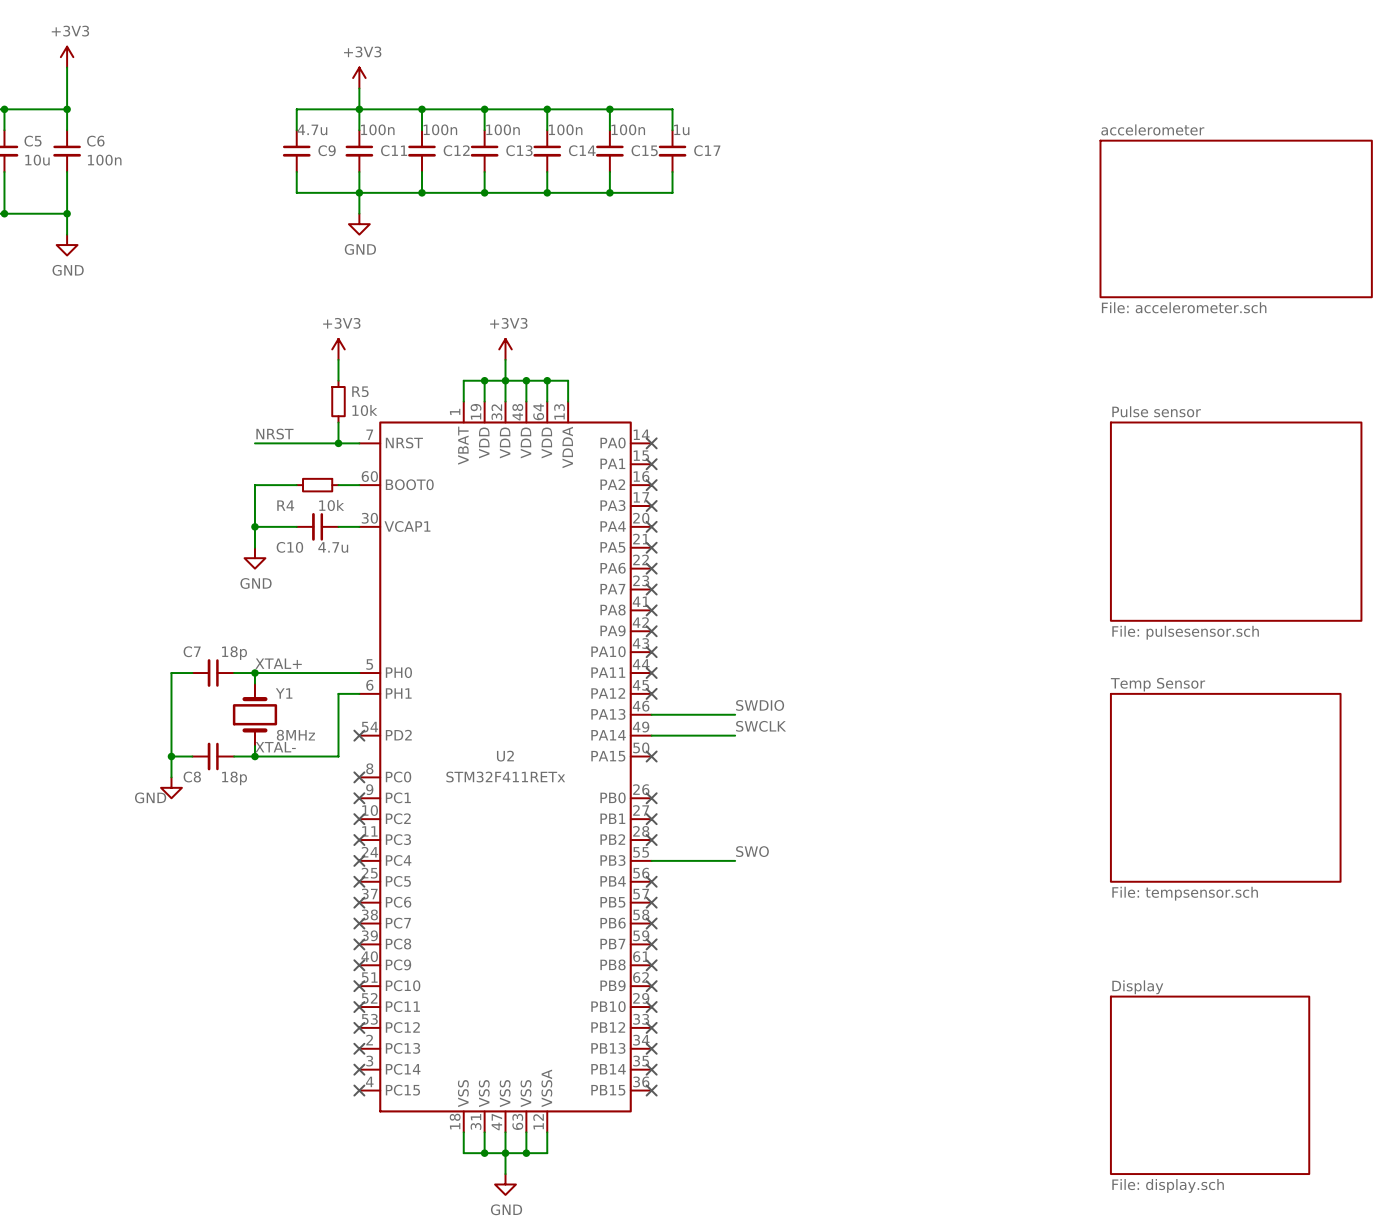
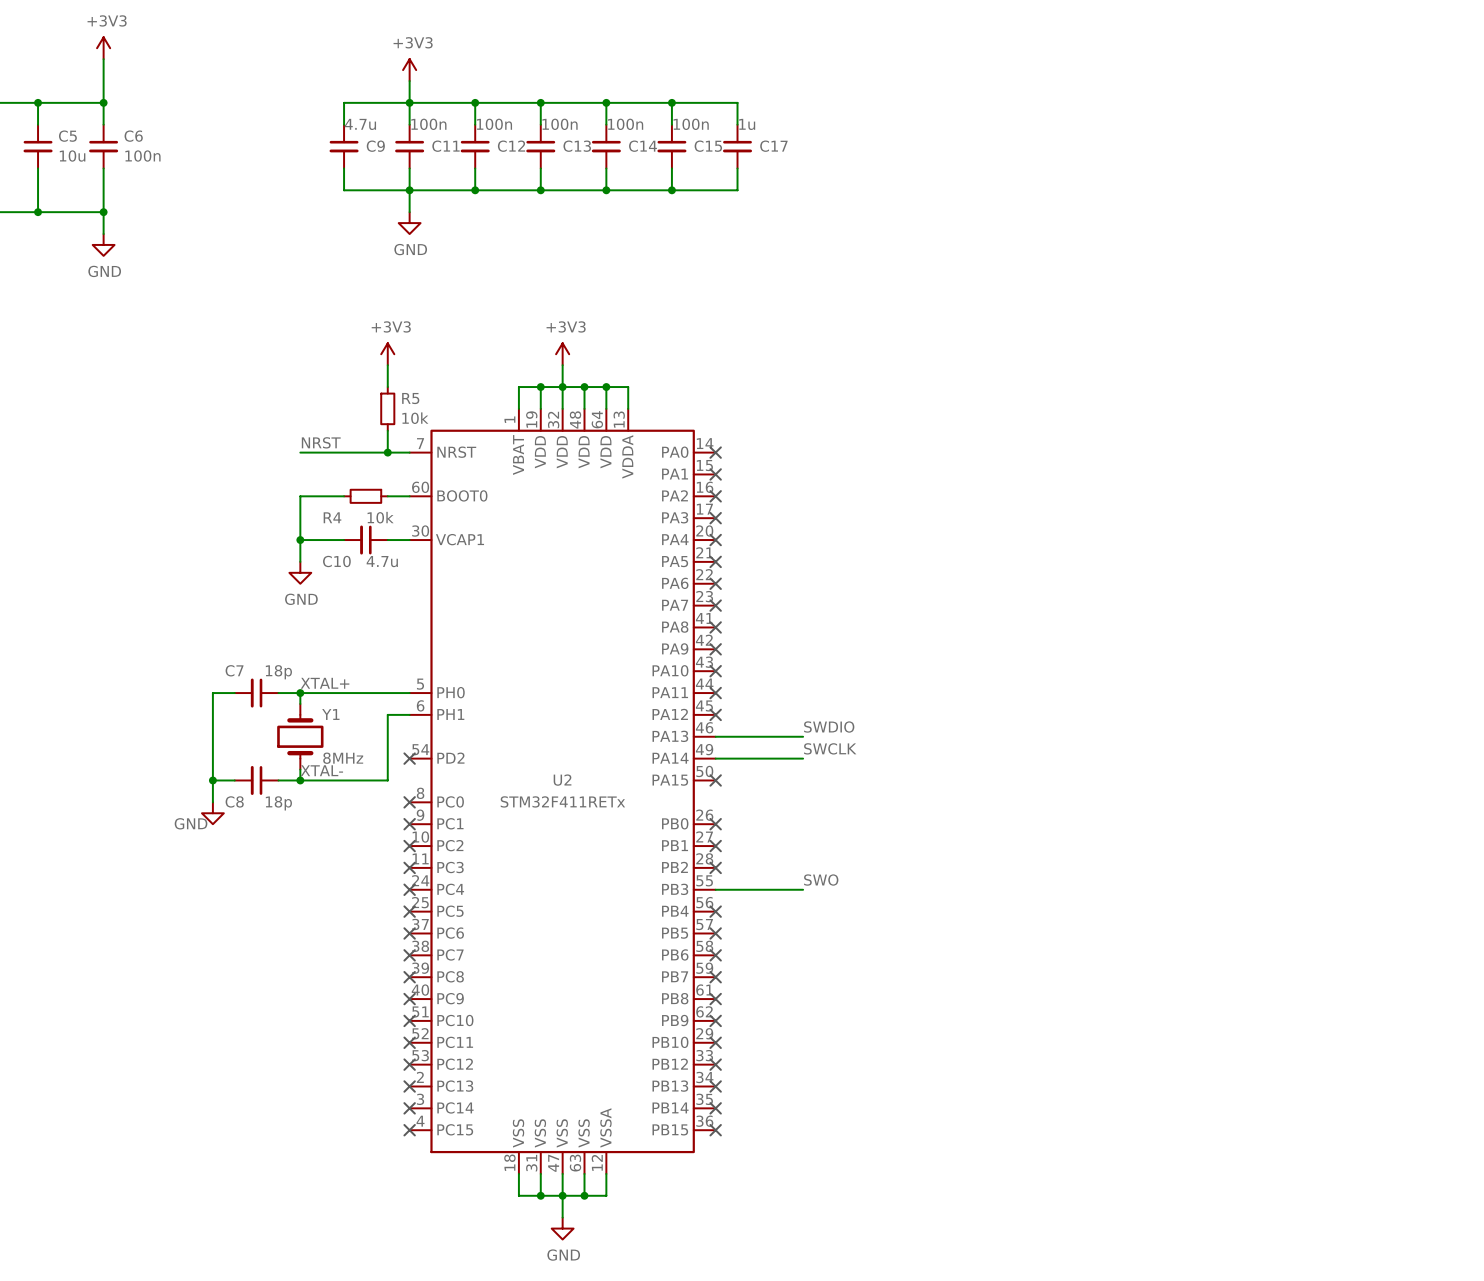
sheet accelerometer: File: accelerometer.sch (1236, 218) -> none
sheet Pulse sensor: File: pulsesensor.sch (1236, 521) -> none
sheet Temp Sensor: File: tempsensor.sch (1225, 787) -> none
sheet Display: File: display.sch (1210, 1085) -> none

